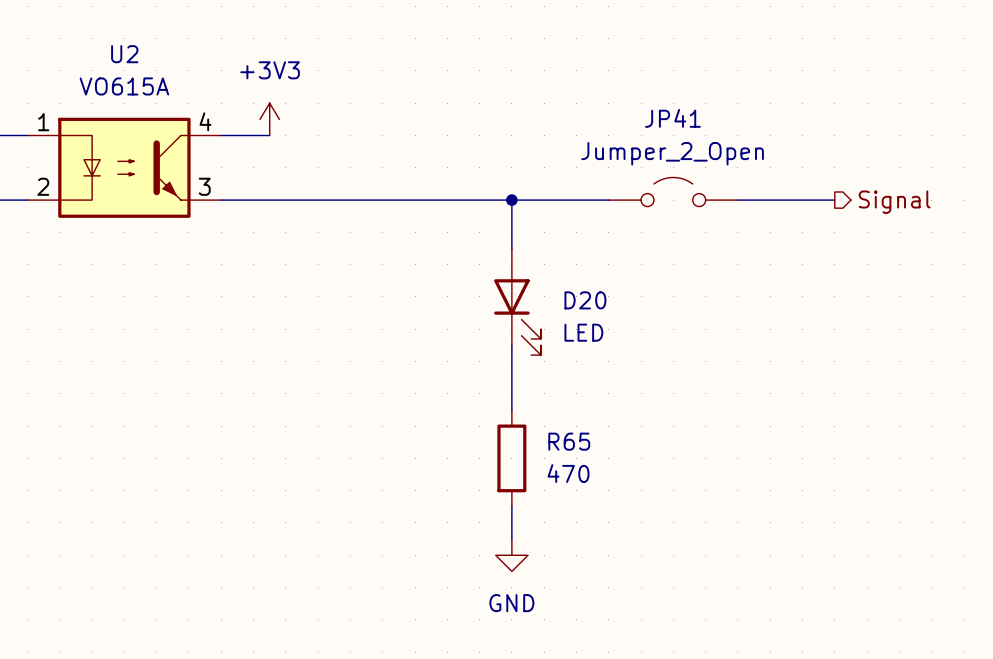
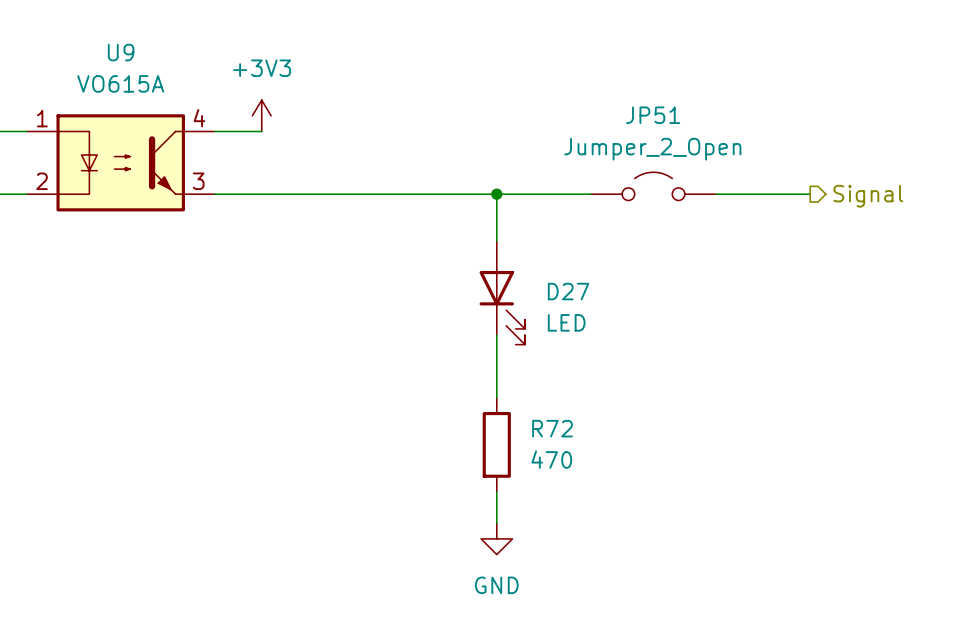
U2 name: U2 (124, 54) -> U9 (121, 52)
JP41 name: JP41 (672, 118) -> JP51 (653, 115)
D20 name: D20 (585, 300) -> D27 (568, 291)
R65 name: R65 (569, 441) -> R72 (552, 428)

